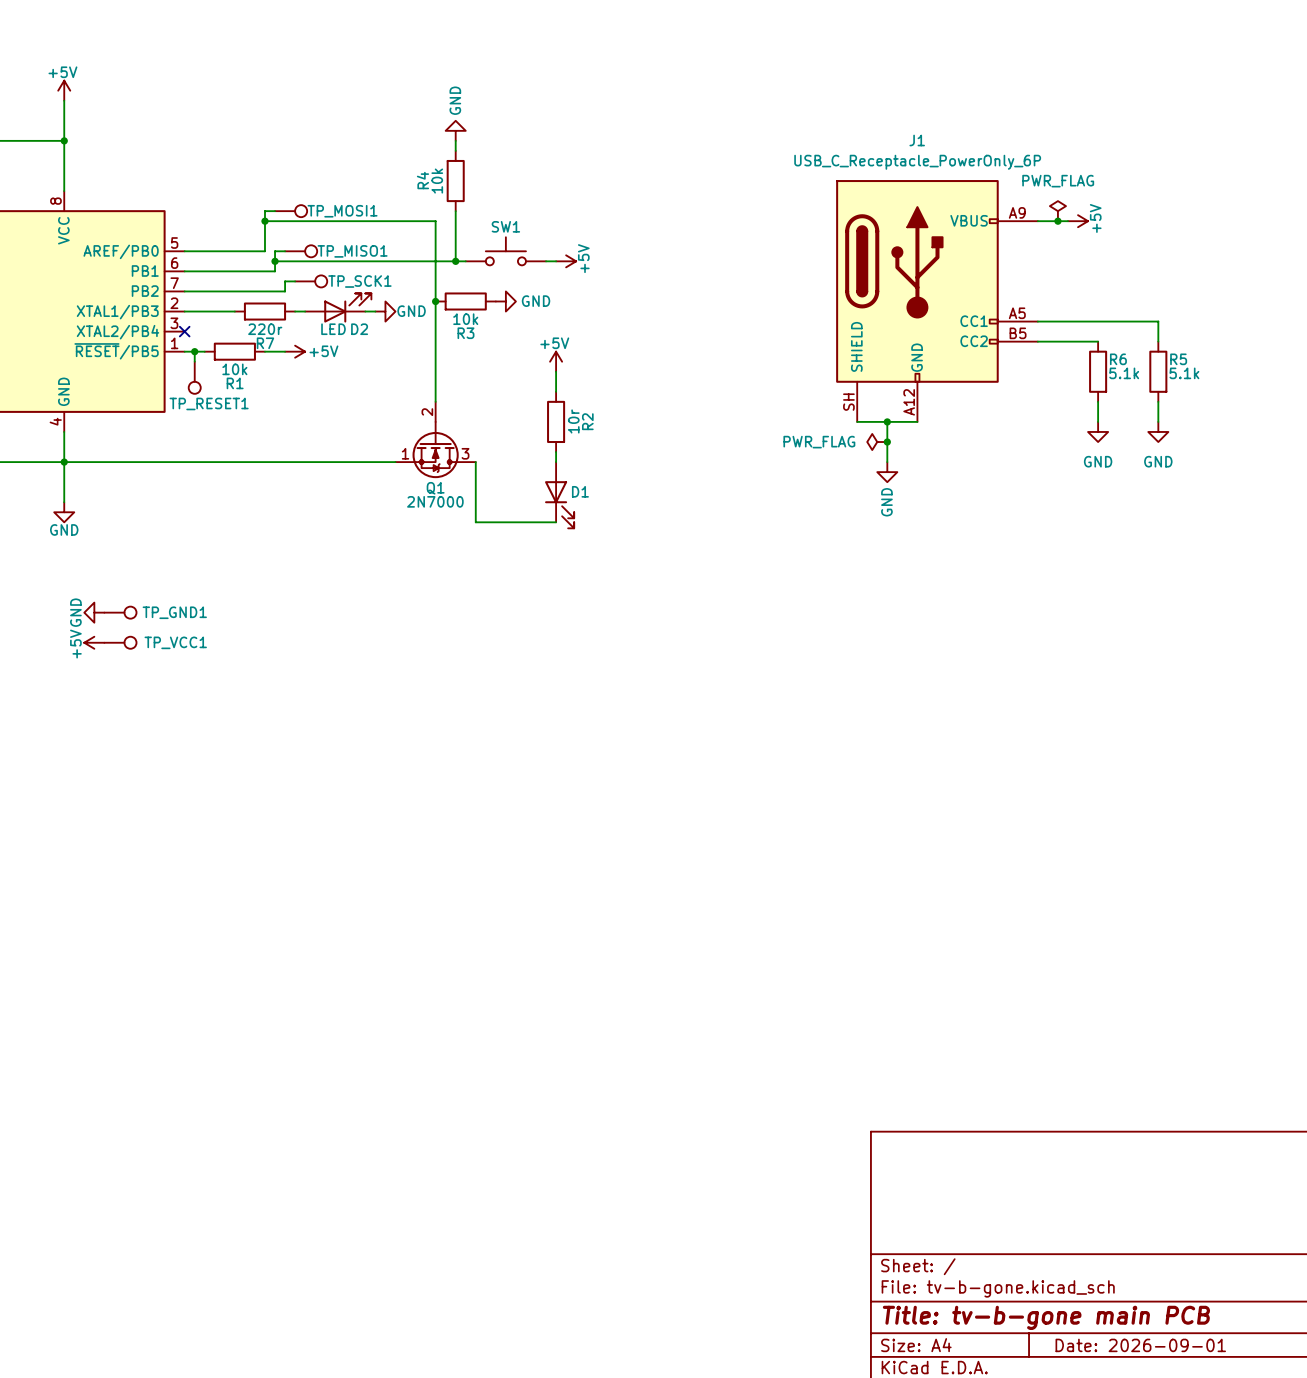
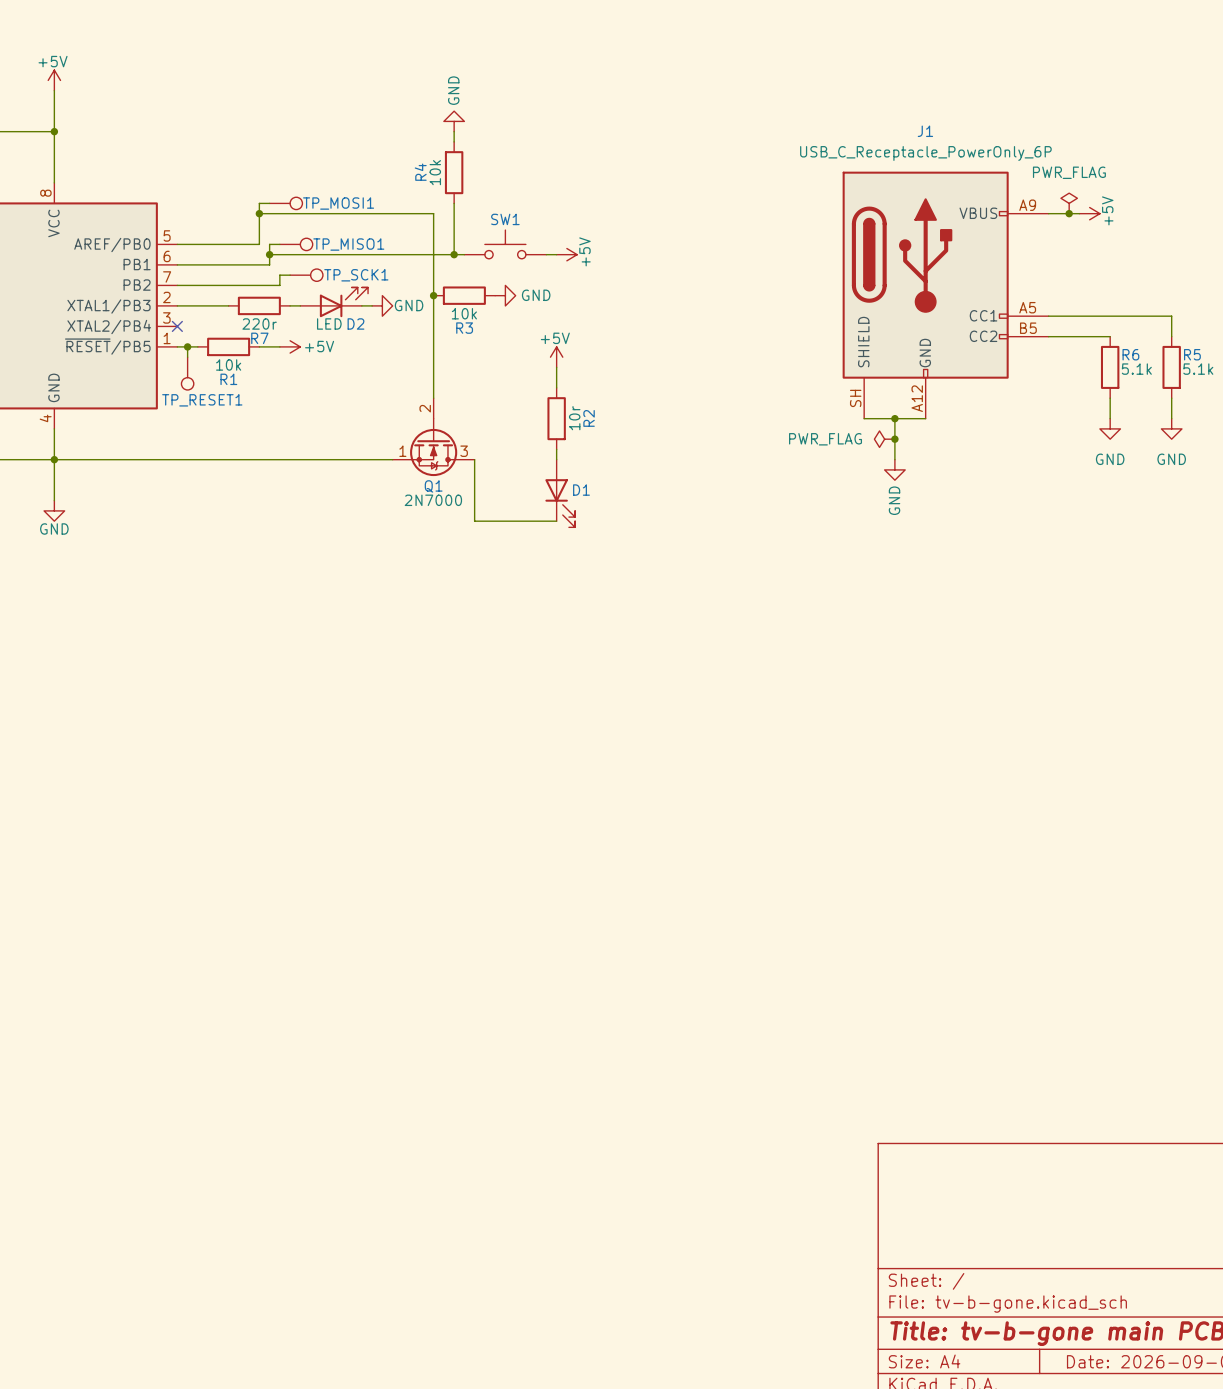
power symbol: GND (94, 612) -> none
TP_GND1: (120, 612) -> none
power symbol: +5V (94, 642) -> none
TP_VCC1: (120, 642) -> none

